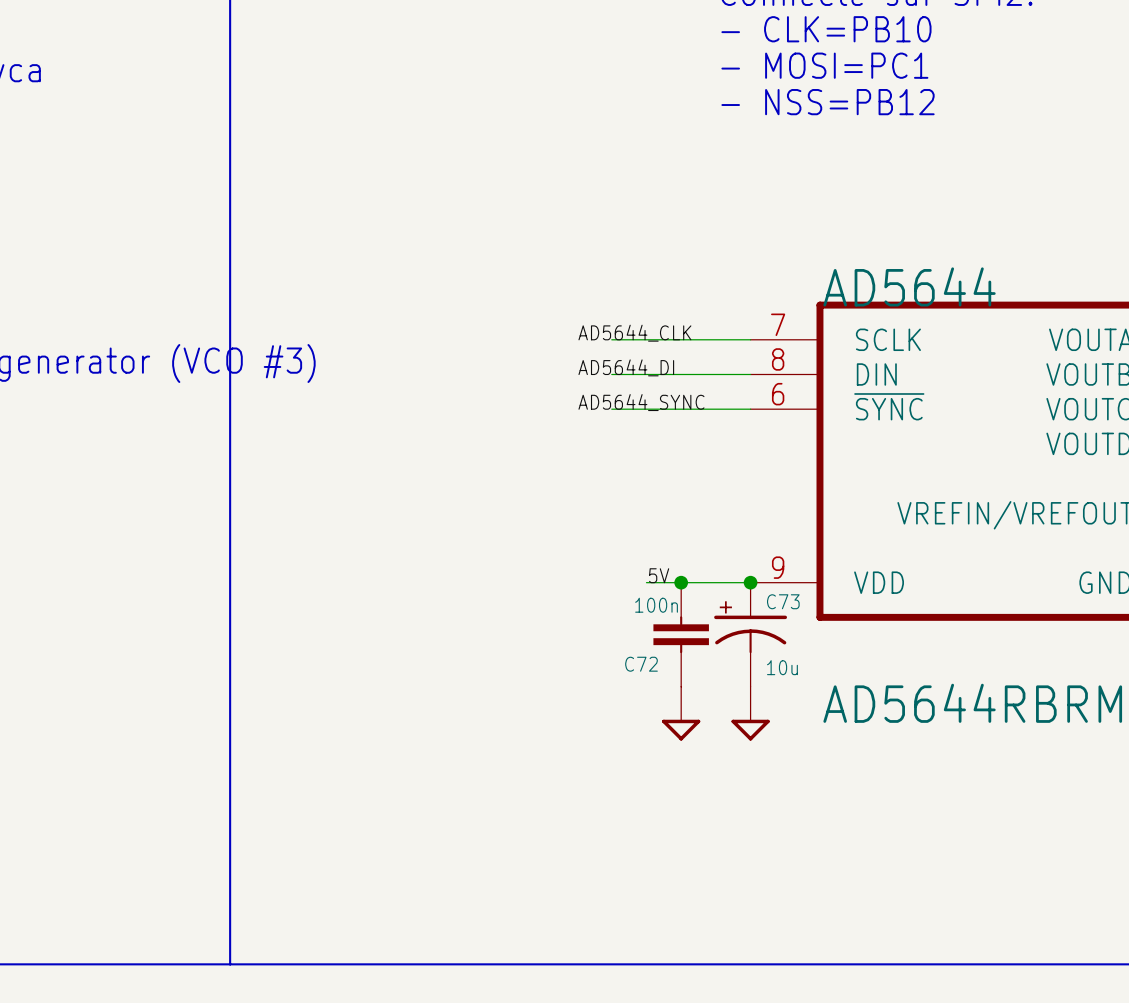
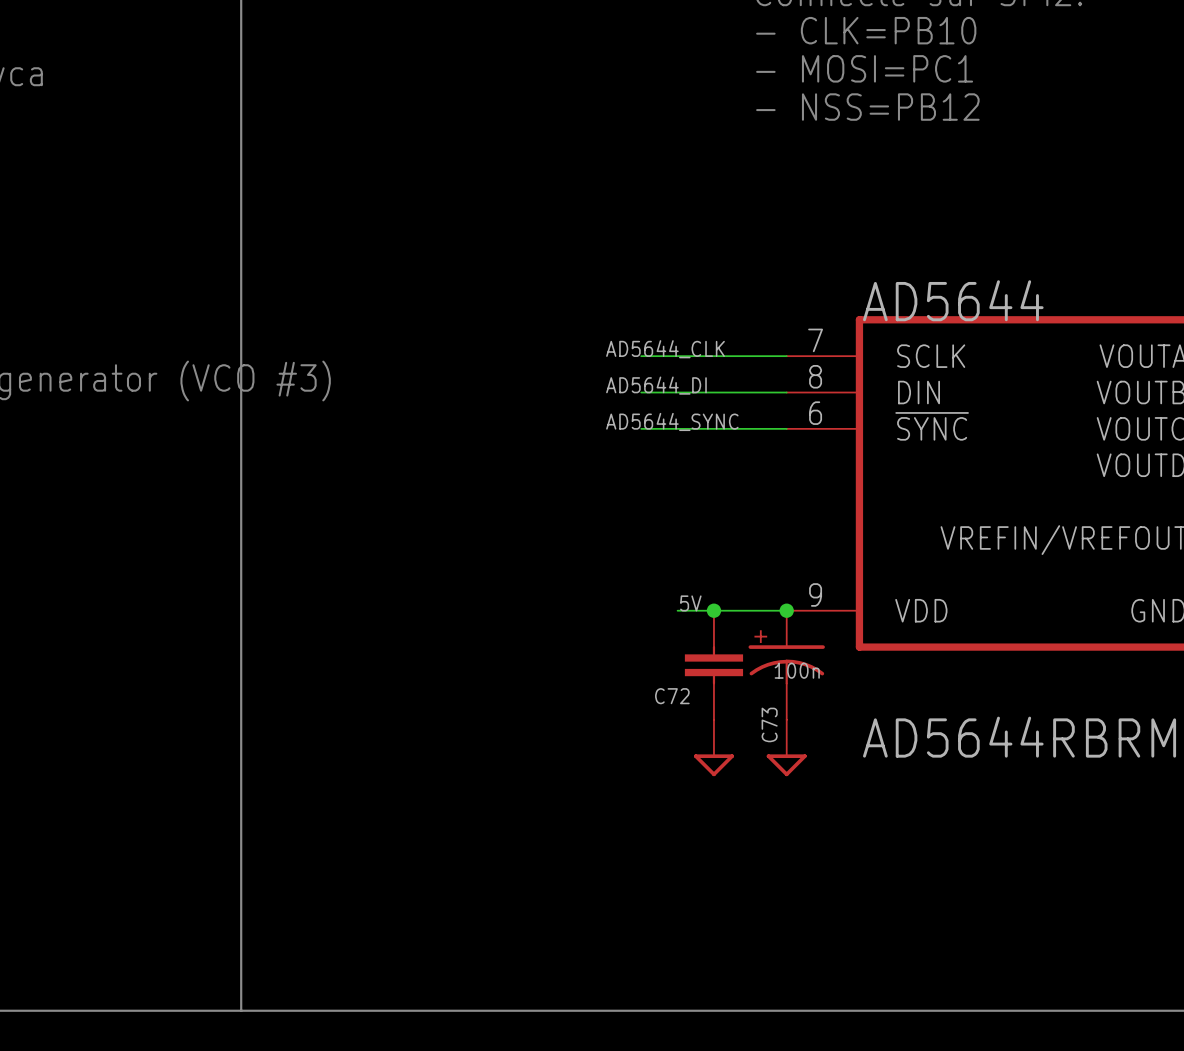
C73 name rotation: 0° (783, 601) -> 90° counterclockwise (769, 724)
C73 name position: C73 (783, 601) -> C73 (769, 724)
C72 value position: 100n (656, 605) -> 100n (797, 670)
C73 value: 10u (782, 667) -> none

